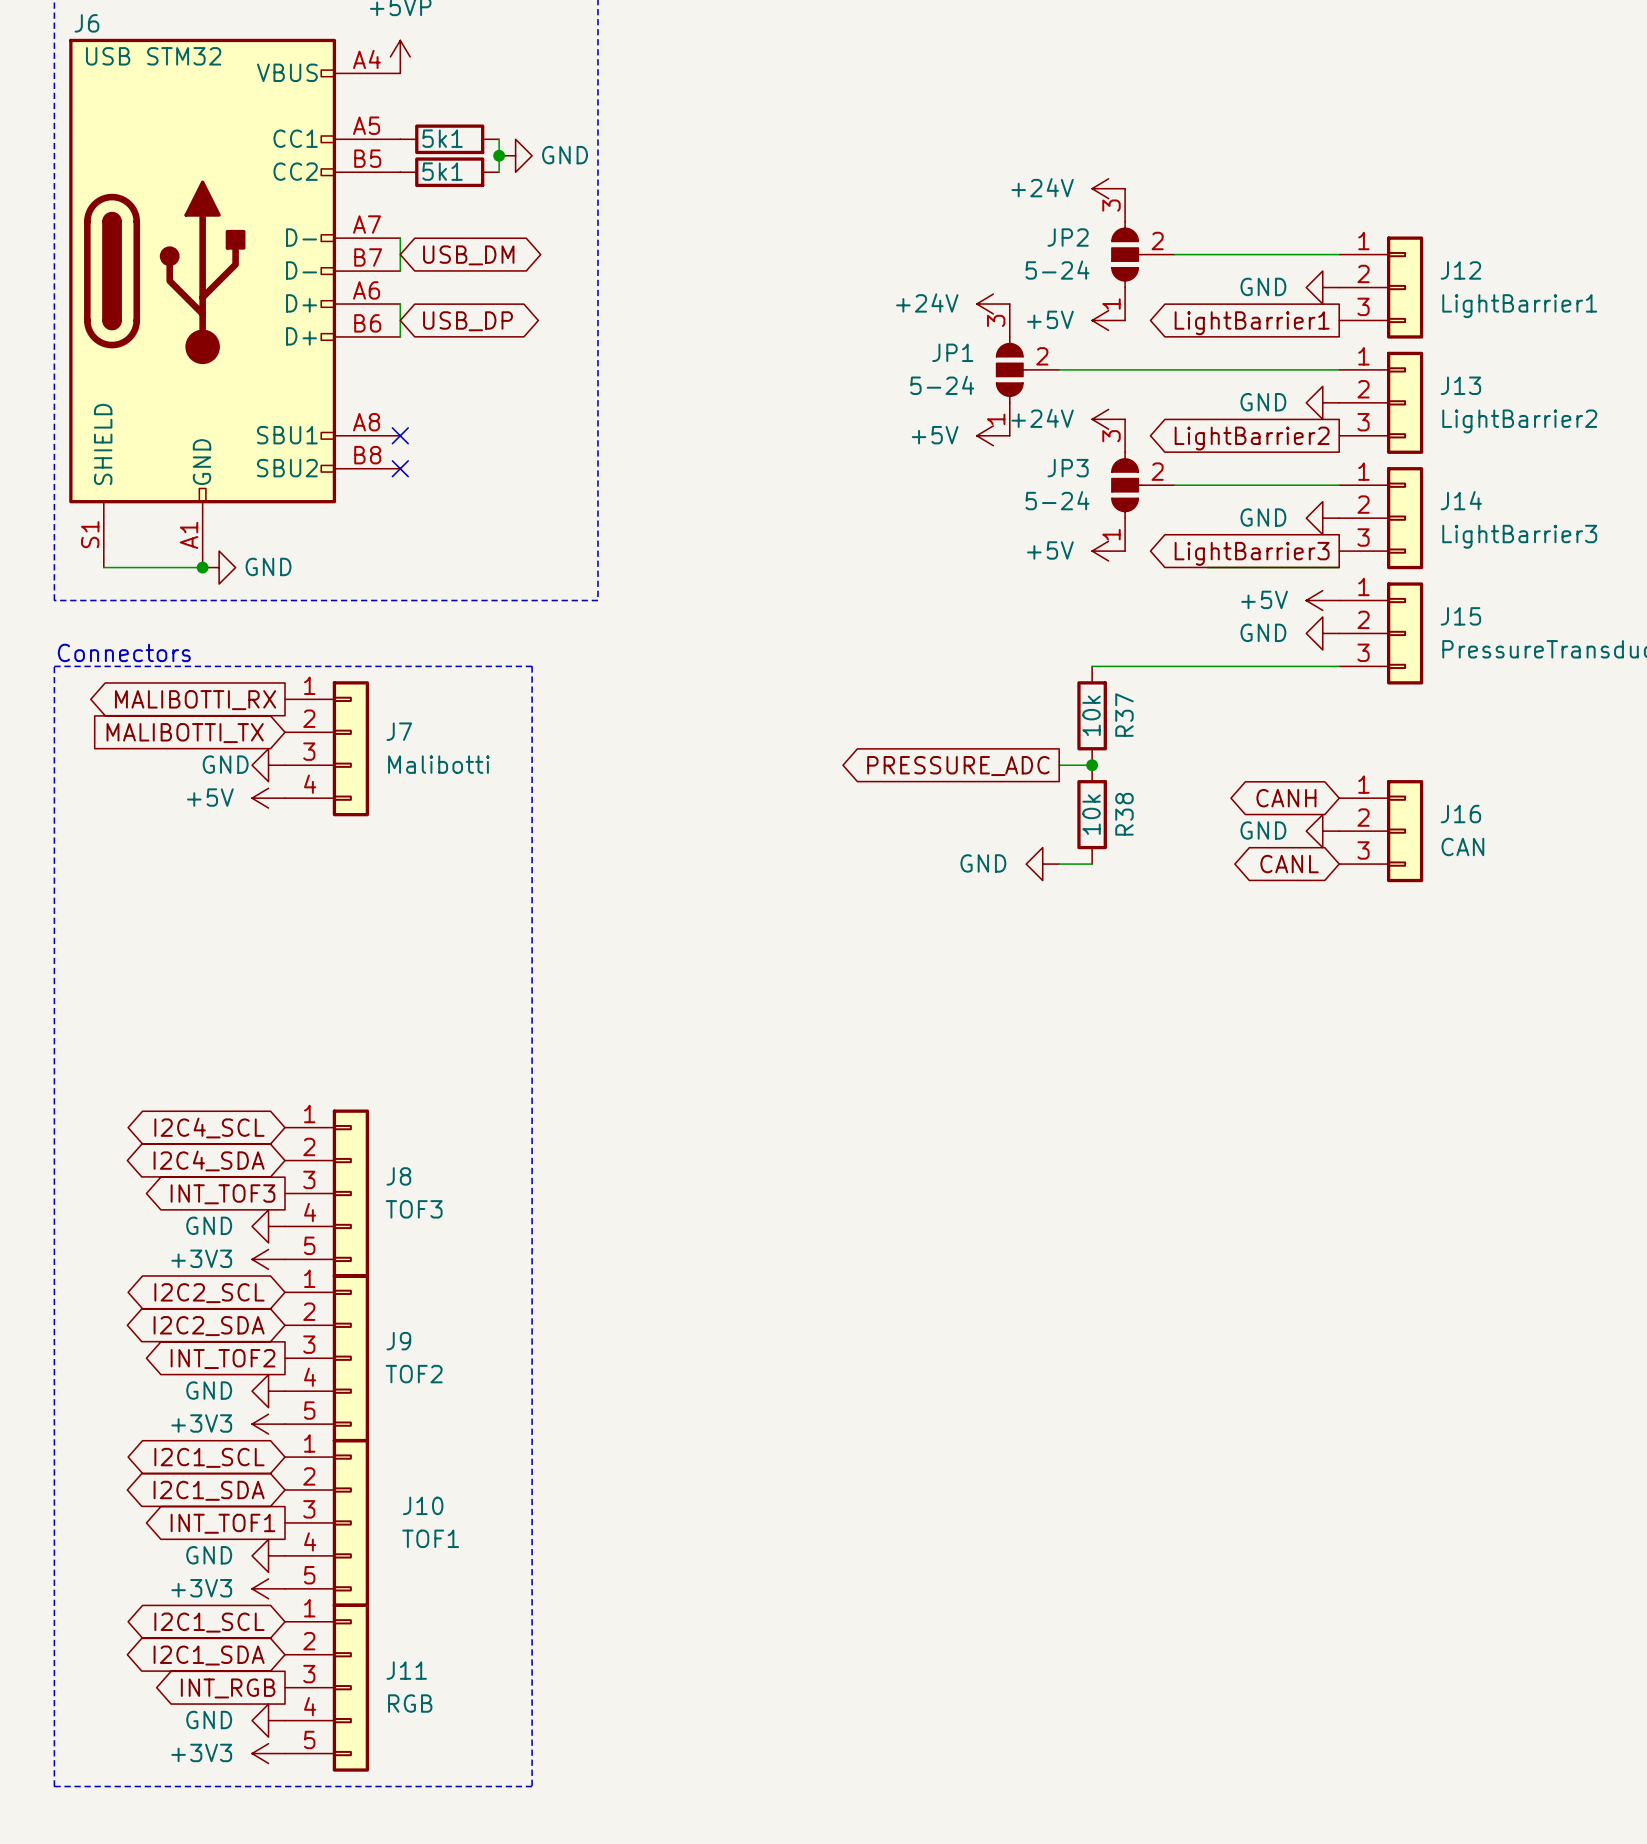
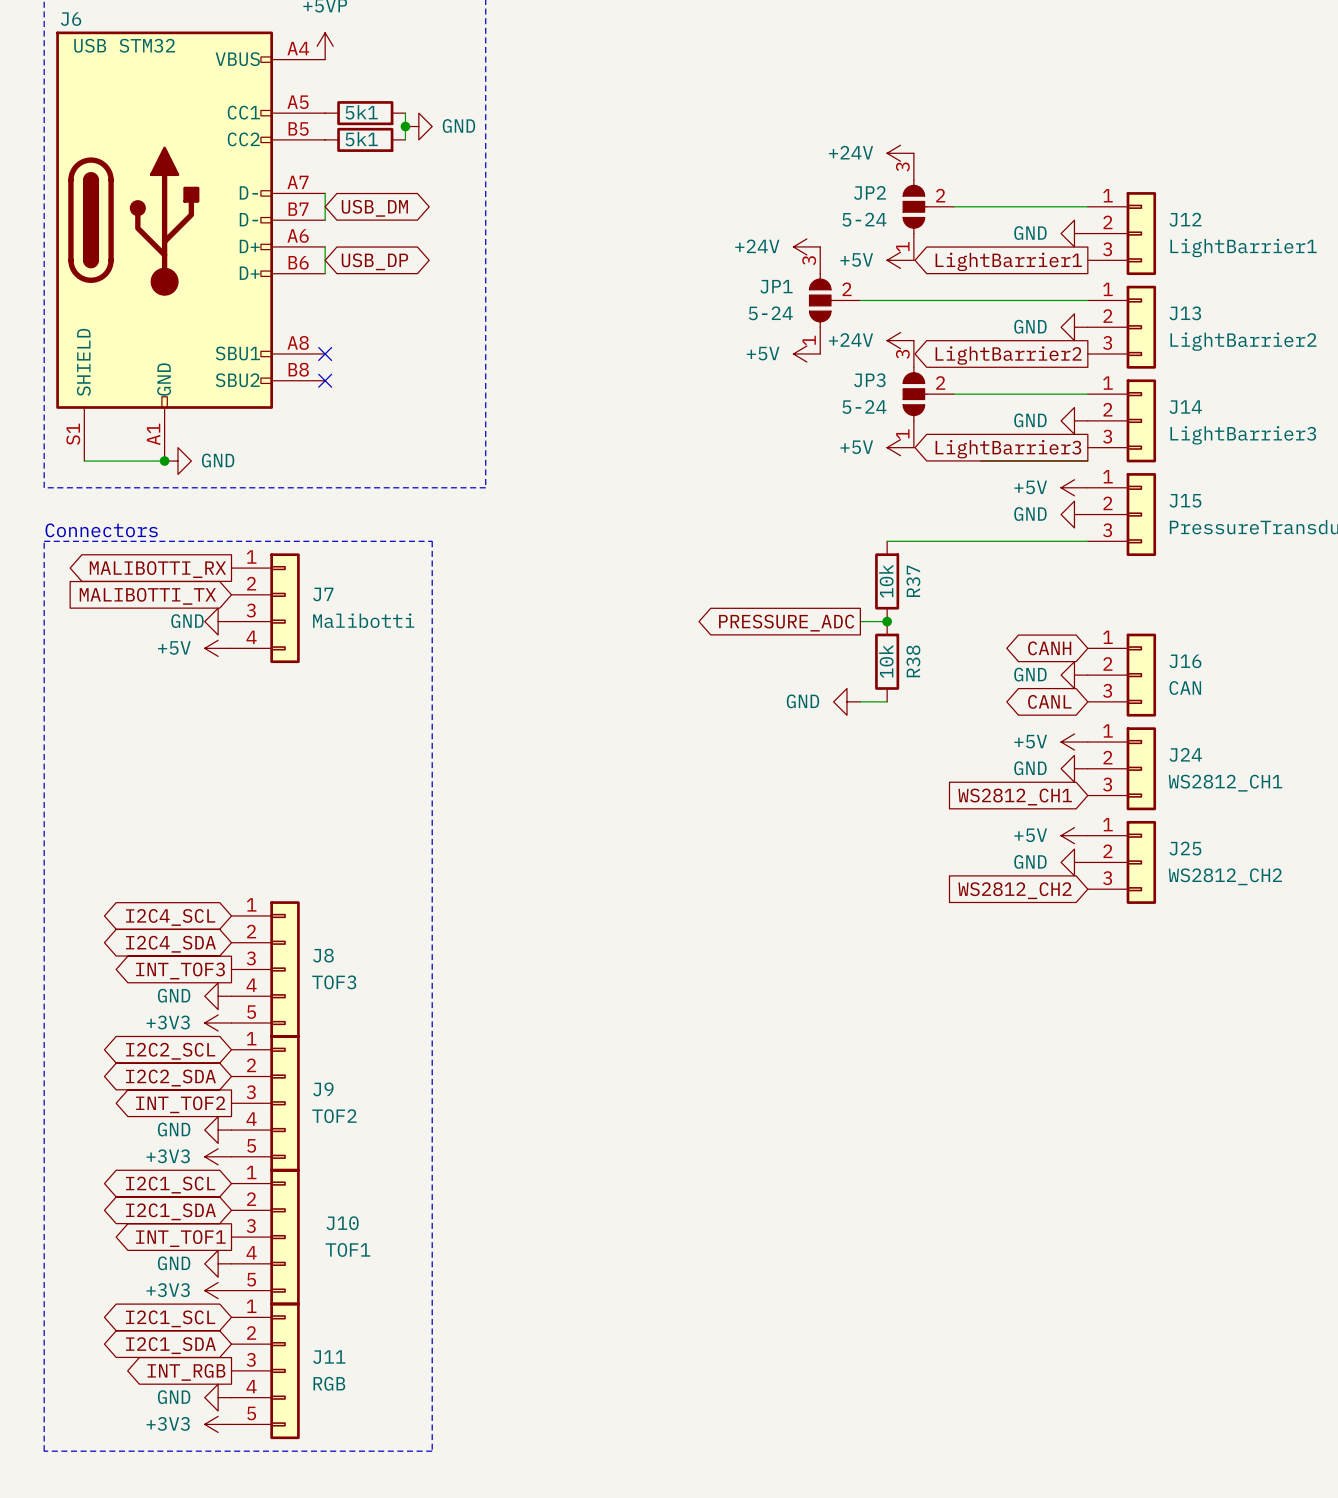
power symbol: none -> +5V (1074, 742)
power symbol: none -> GND (1074, 768)
J24: none -> WS2812_CH1 (1121, 768)
global label: none -> WS2812_CH1 (1015, 797)
power symbol: none -> +5V (1074, 835)
power symbol: none -> GND (1074, 862)
J25: none -> WS2812_CH2 (1121, 862)
global label: none -> WS2812_CH2 (1015, 890)

